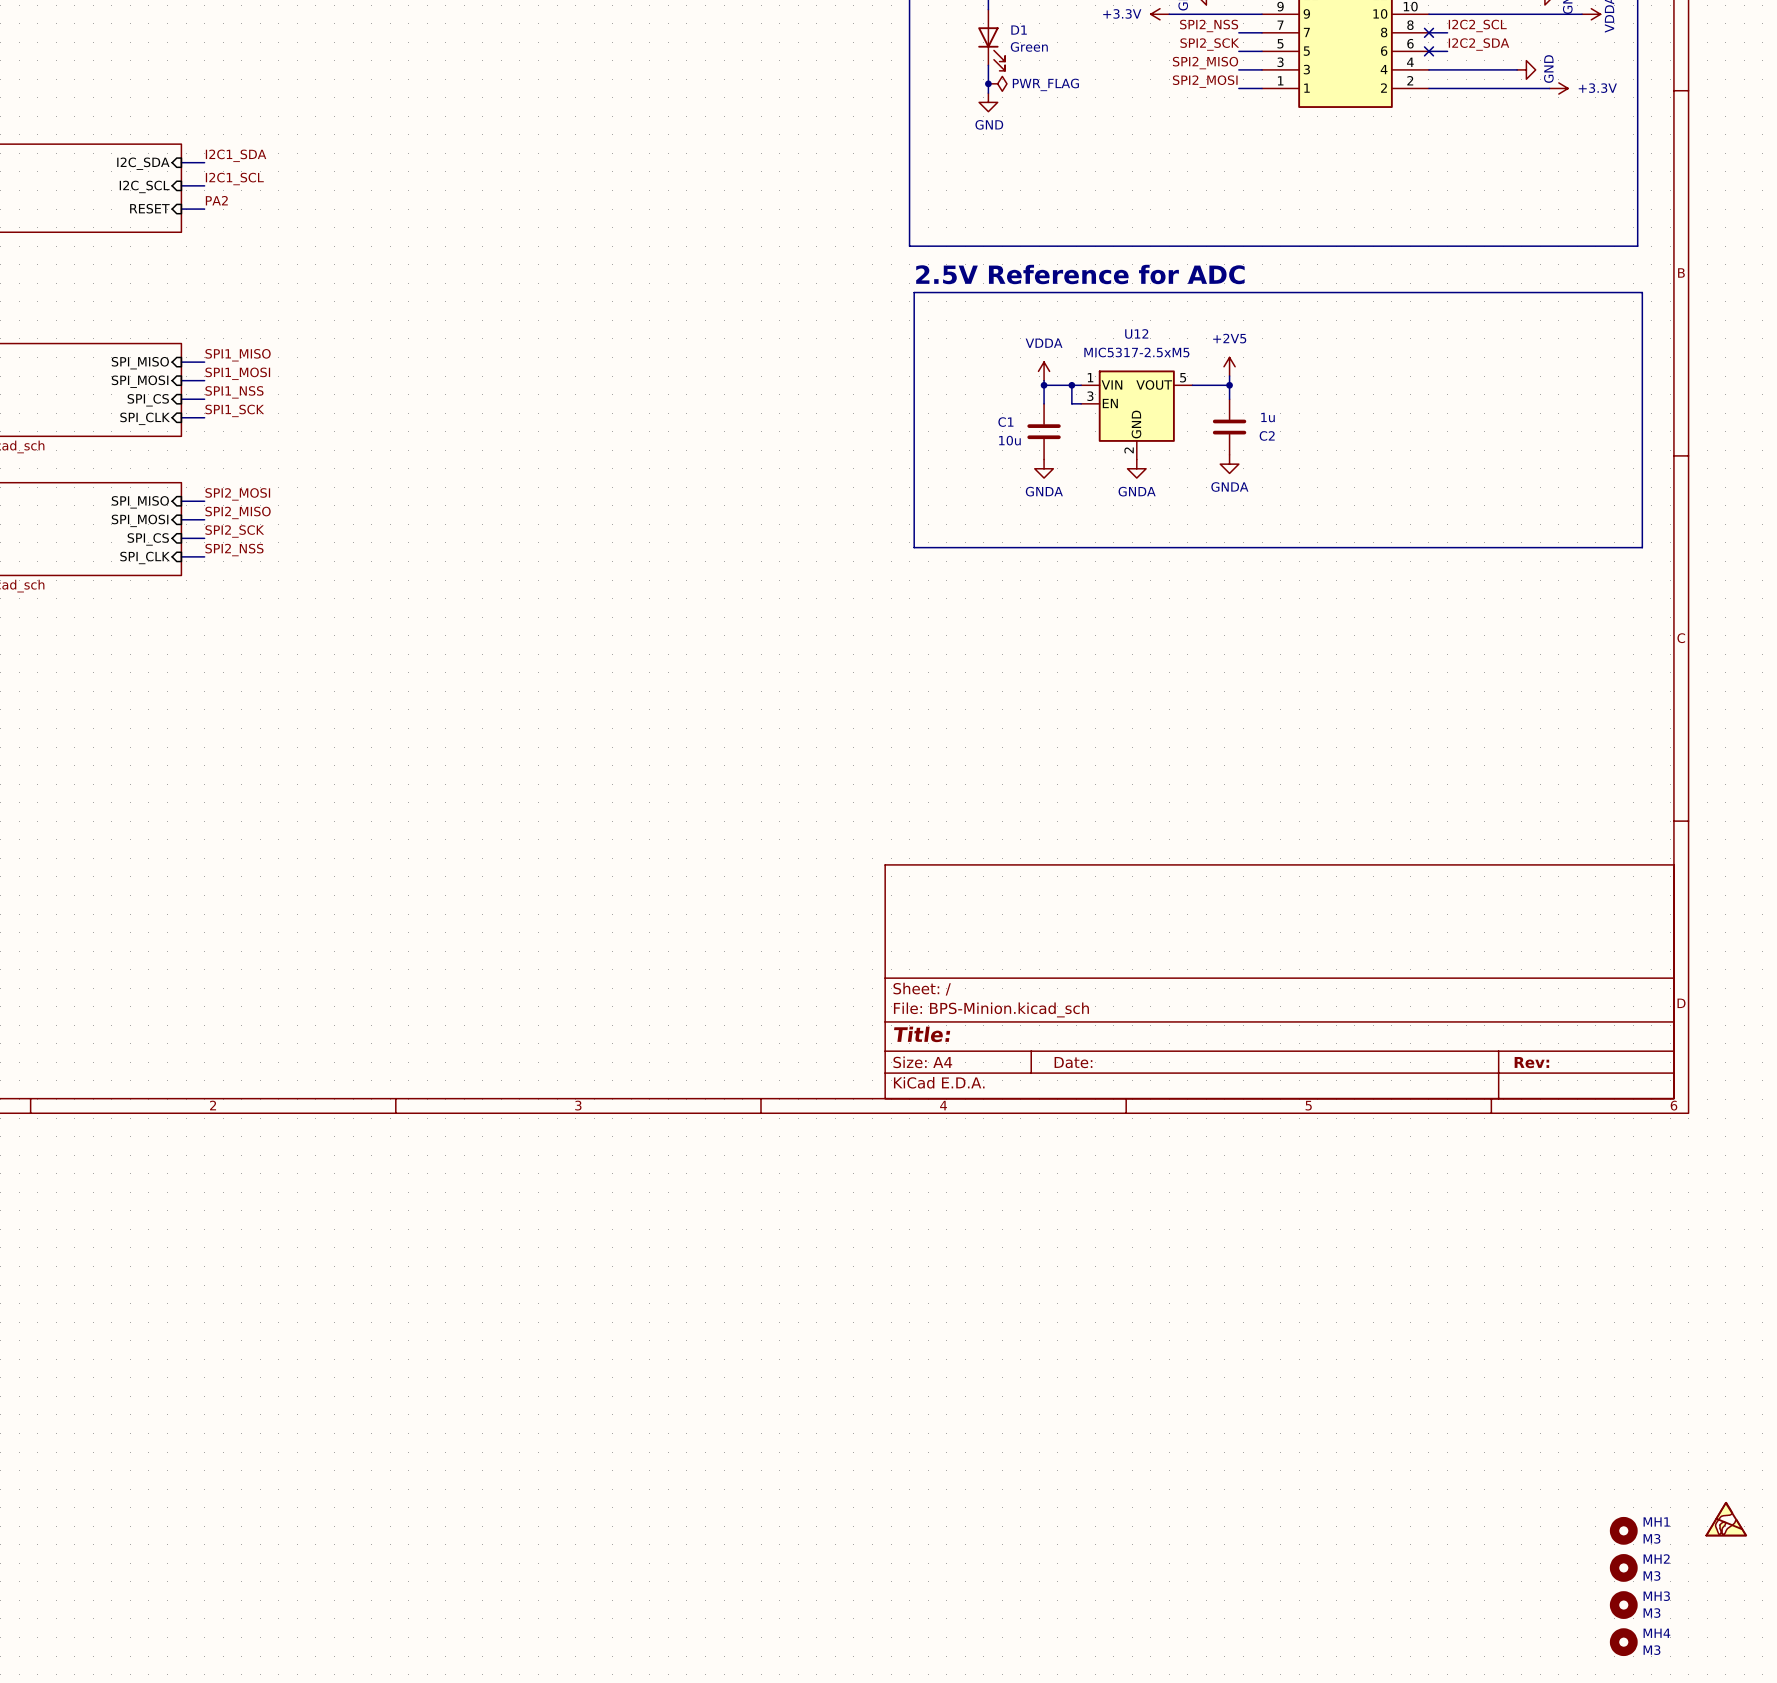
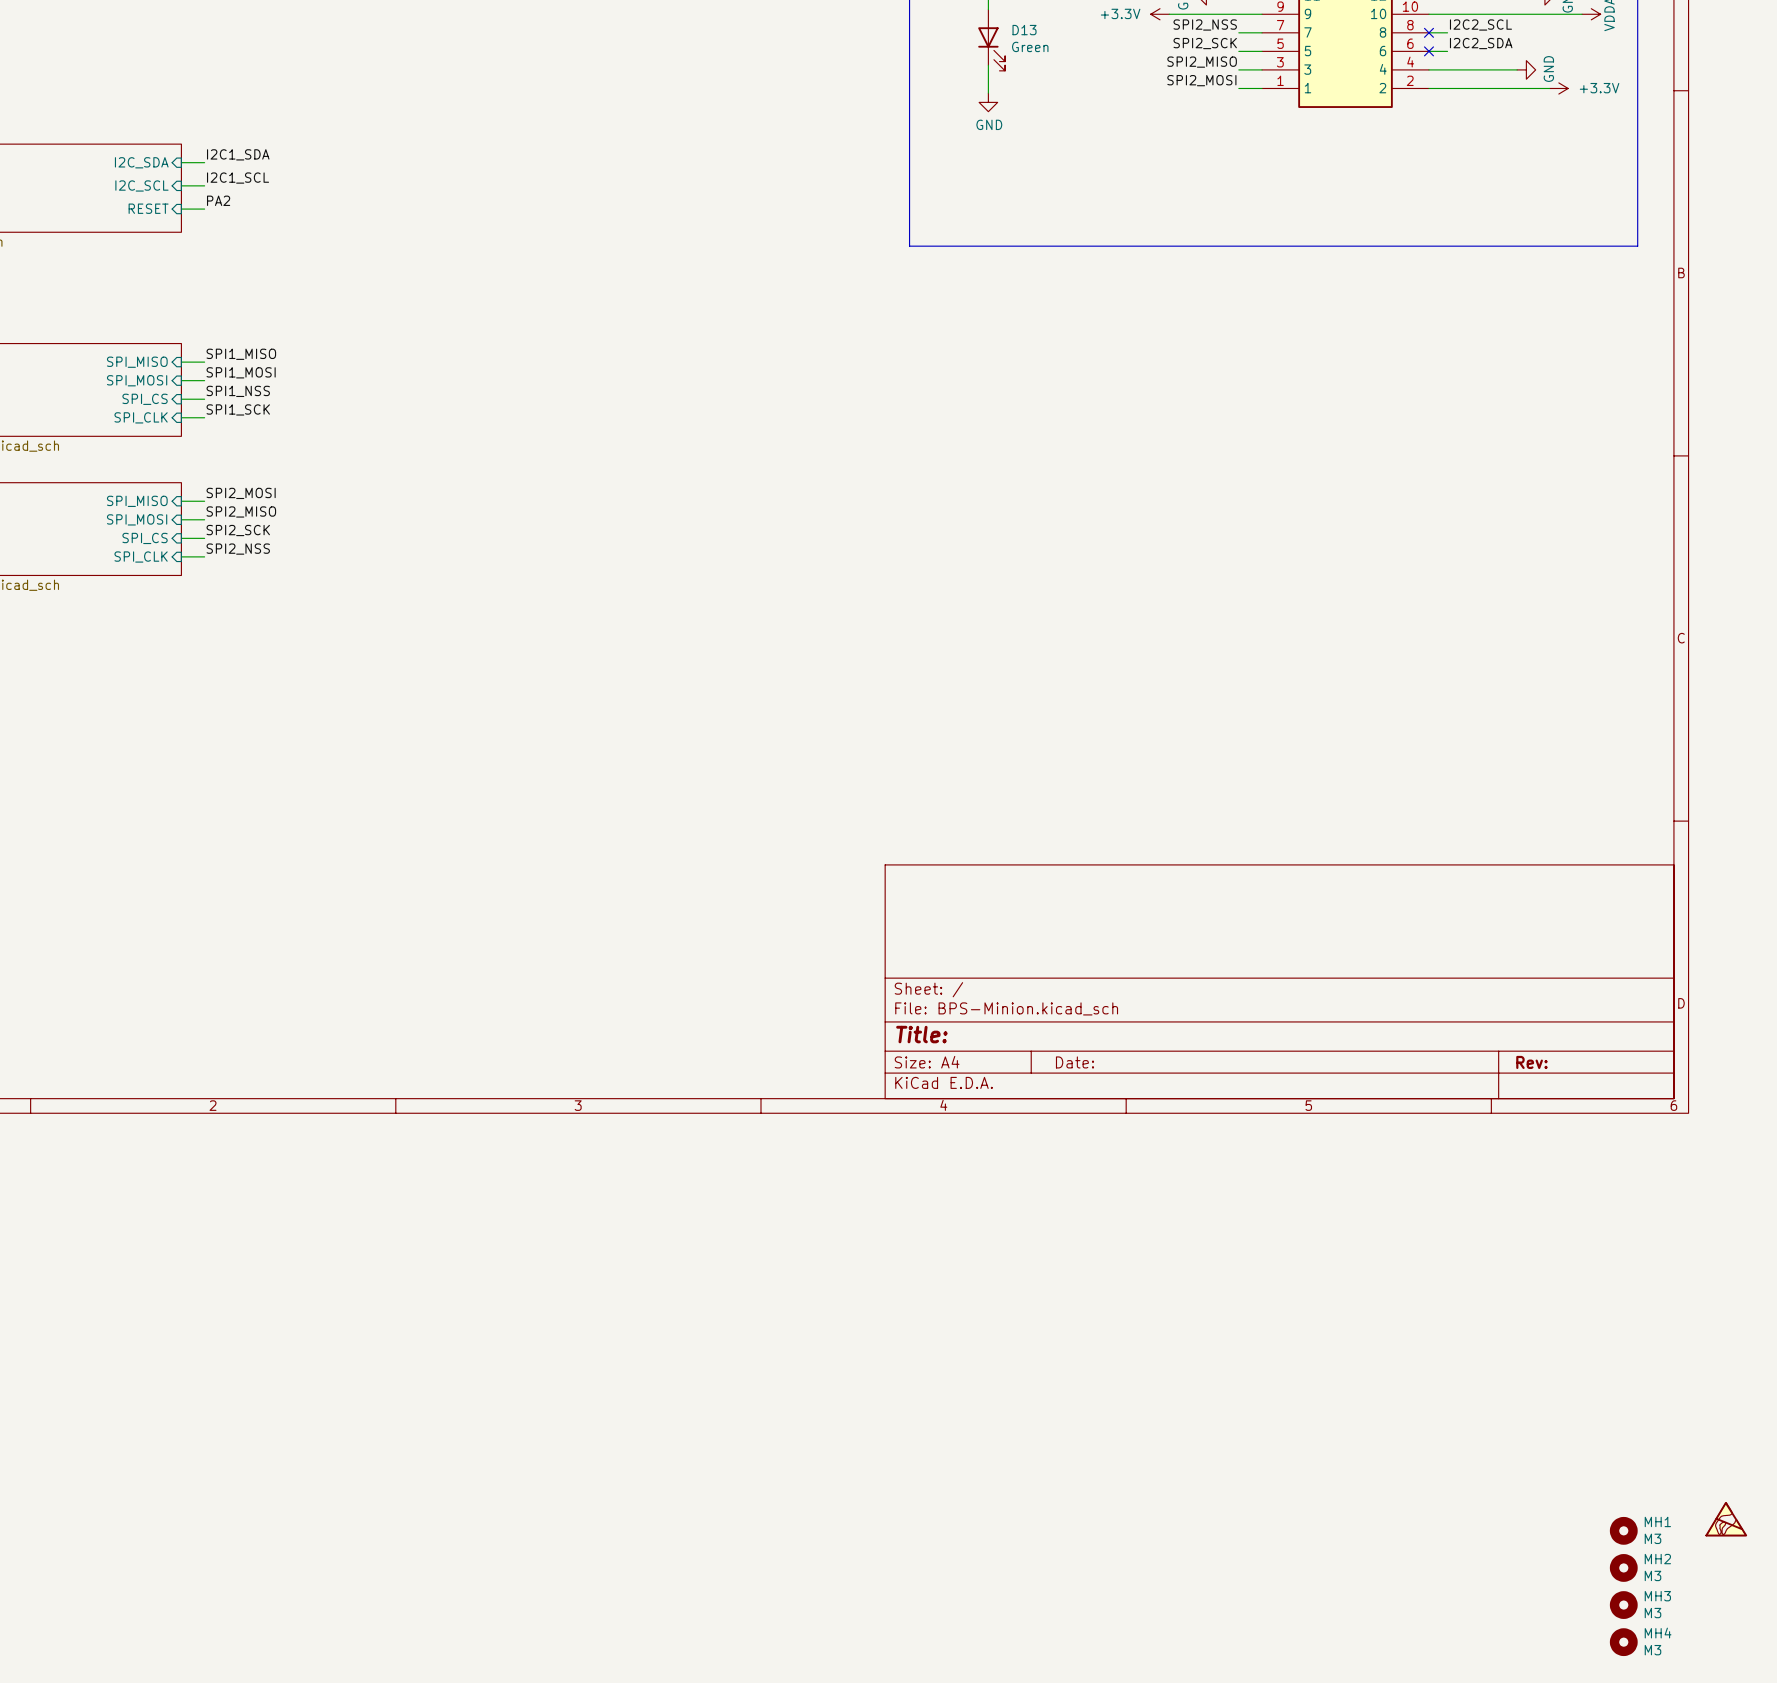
D1 name: D1 (1019, 30) -> D13 (1024, 30)
junction: (988, 83) -> none
power symbol: PWR_FLAG (997, 83) -> none
text: 2.5V Reference for ADC (1080, 274) -> none
line: (914, 292) (1642, 292) (1642, 547) (914, 547) (914, 292) -> none
power symbol: +2V5 (1229, 366) -> none
power symbol: VDDA (1044, 371) -> none
wire: (1229, 376) (1229, 399) -> none
wire: (1044, 380) (1044, 403) -> none
wire: (1044, 385) (1081, 385) -> none
junction: (1044, 385) -> none
wire: (1071, 385) (1071, 403) (1081, 403) -> none
junction: (1071, 385) -> none
wire: (1192, 385) (1229, 385) -> none
junction: (1229, 385) -> none
U12: MIC5317-2.5xM5 (1136, 414) -> none
C2: 1u (1229, 427) -> none
C1: 10u (1044, 431) -> none
power symbol: GNDA (1229, 464) -> none
power symbol: GNDA (1044, 468) -> none
power symbol: GNDA (1136, 468) -> none

